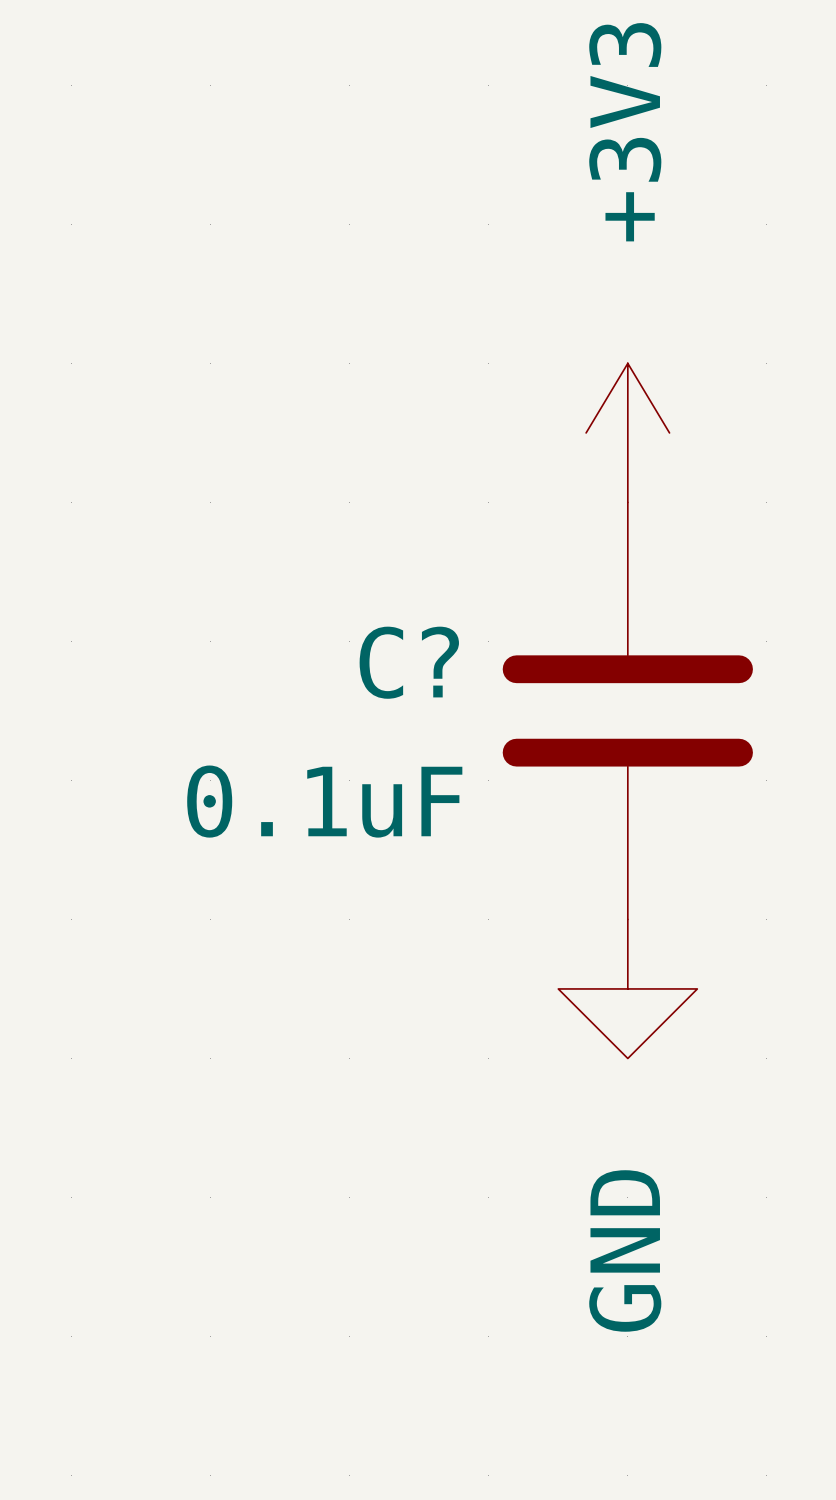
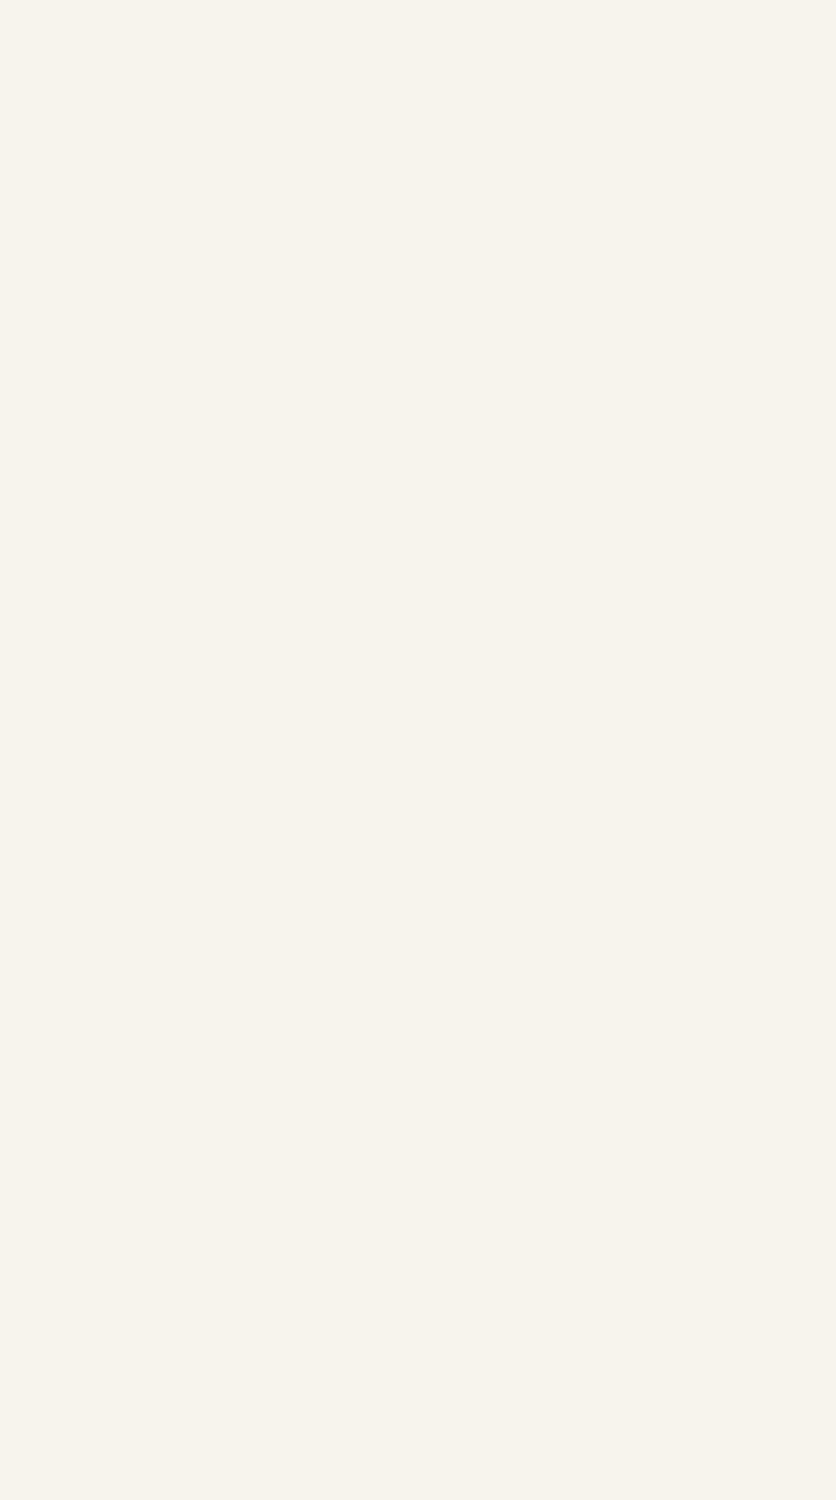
power symbol: +3V3 (627, 432) -> none
C?: 0.1uF (627, 710) -> none
power symbol: GND (627, 988) -> none

